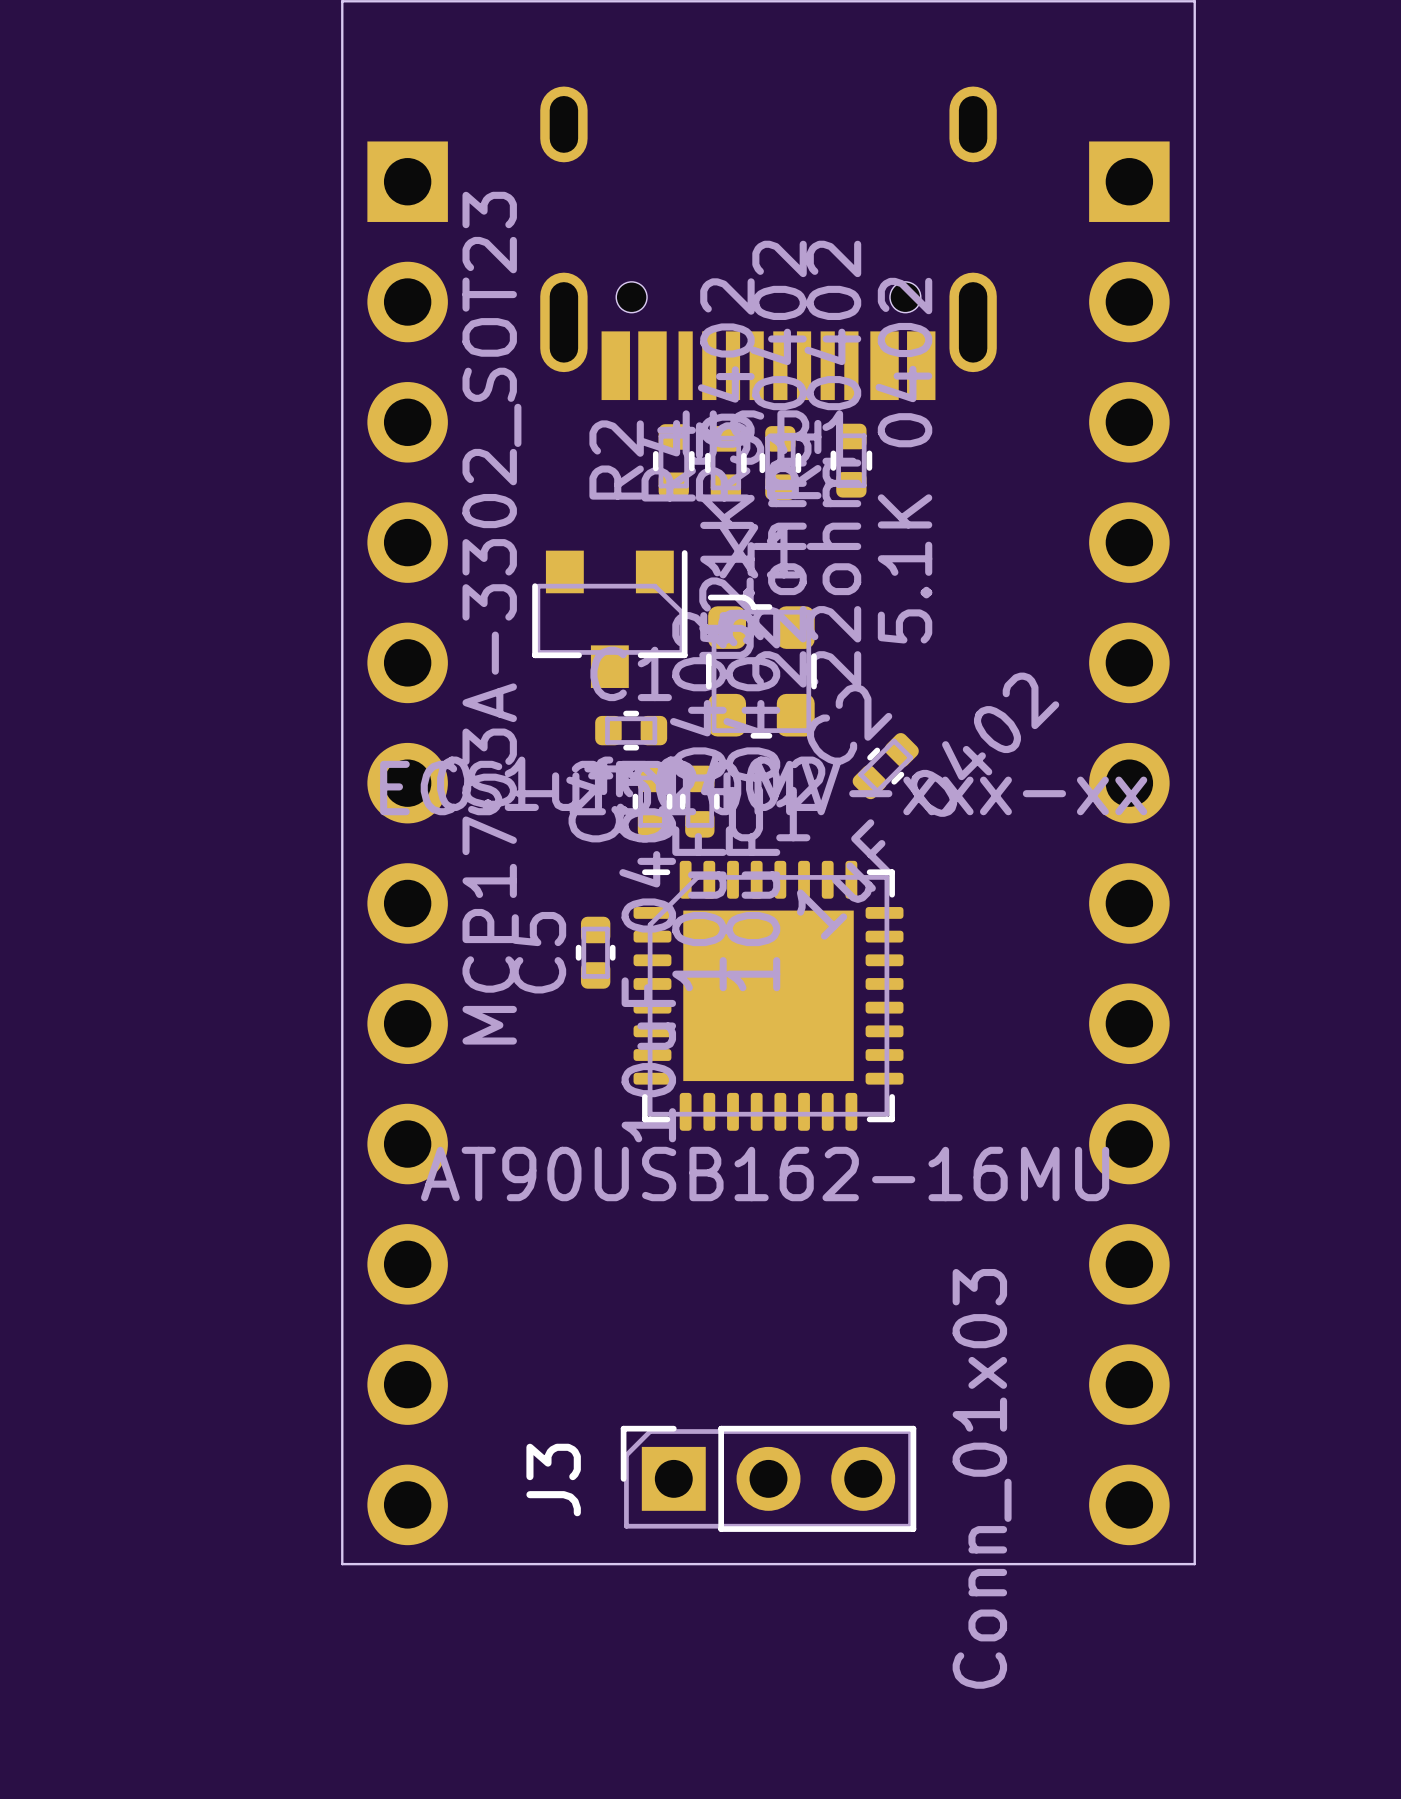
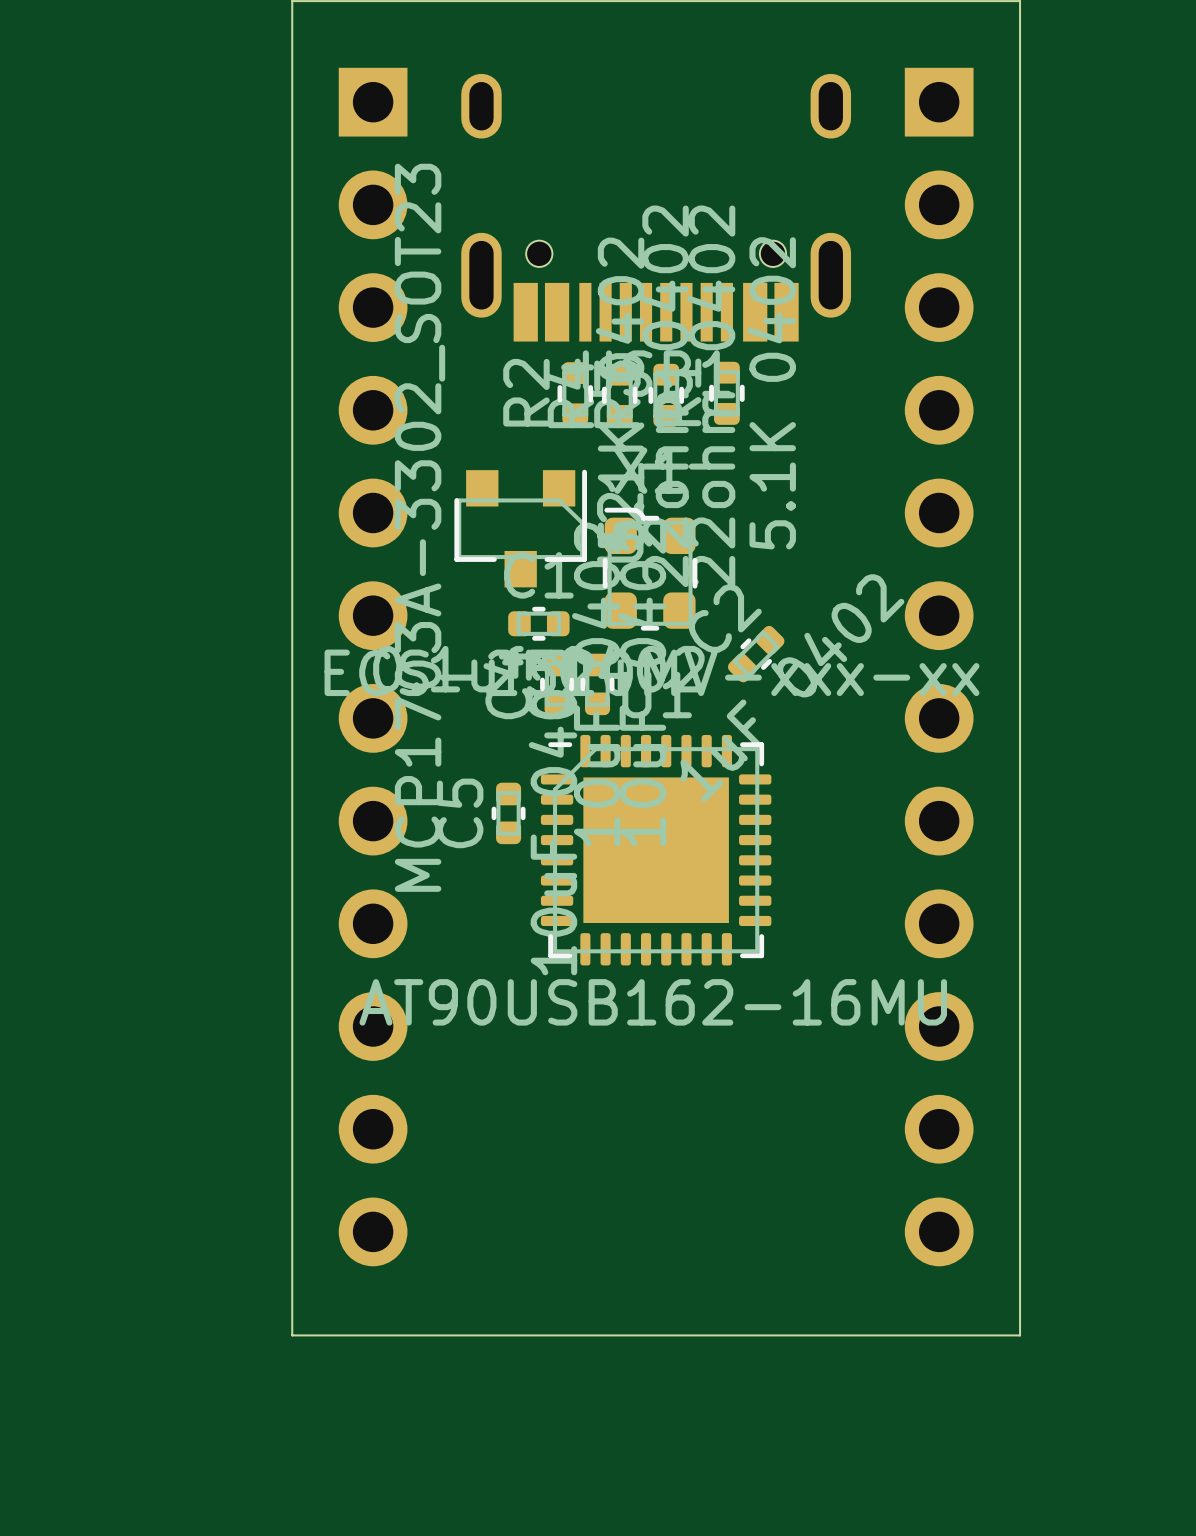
part position: (407, 843) -> (373, 667)
part position: (1129, 843) -> (939, 667)
J3: Conn_01x03 (768, 1478) -> none

